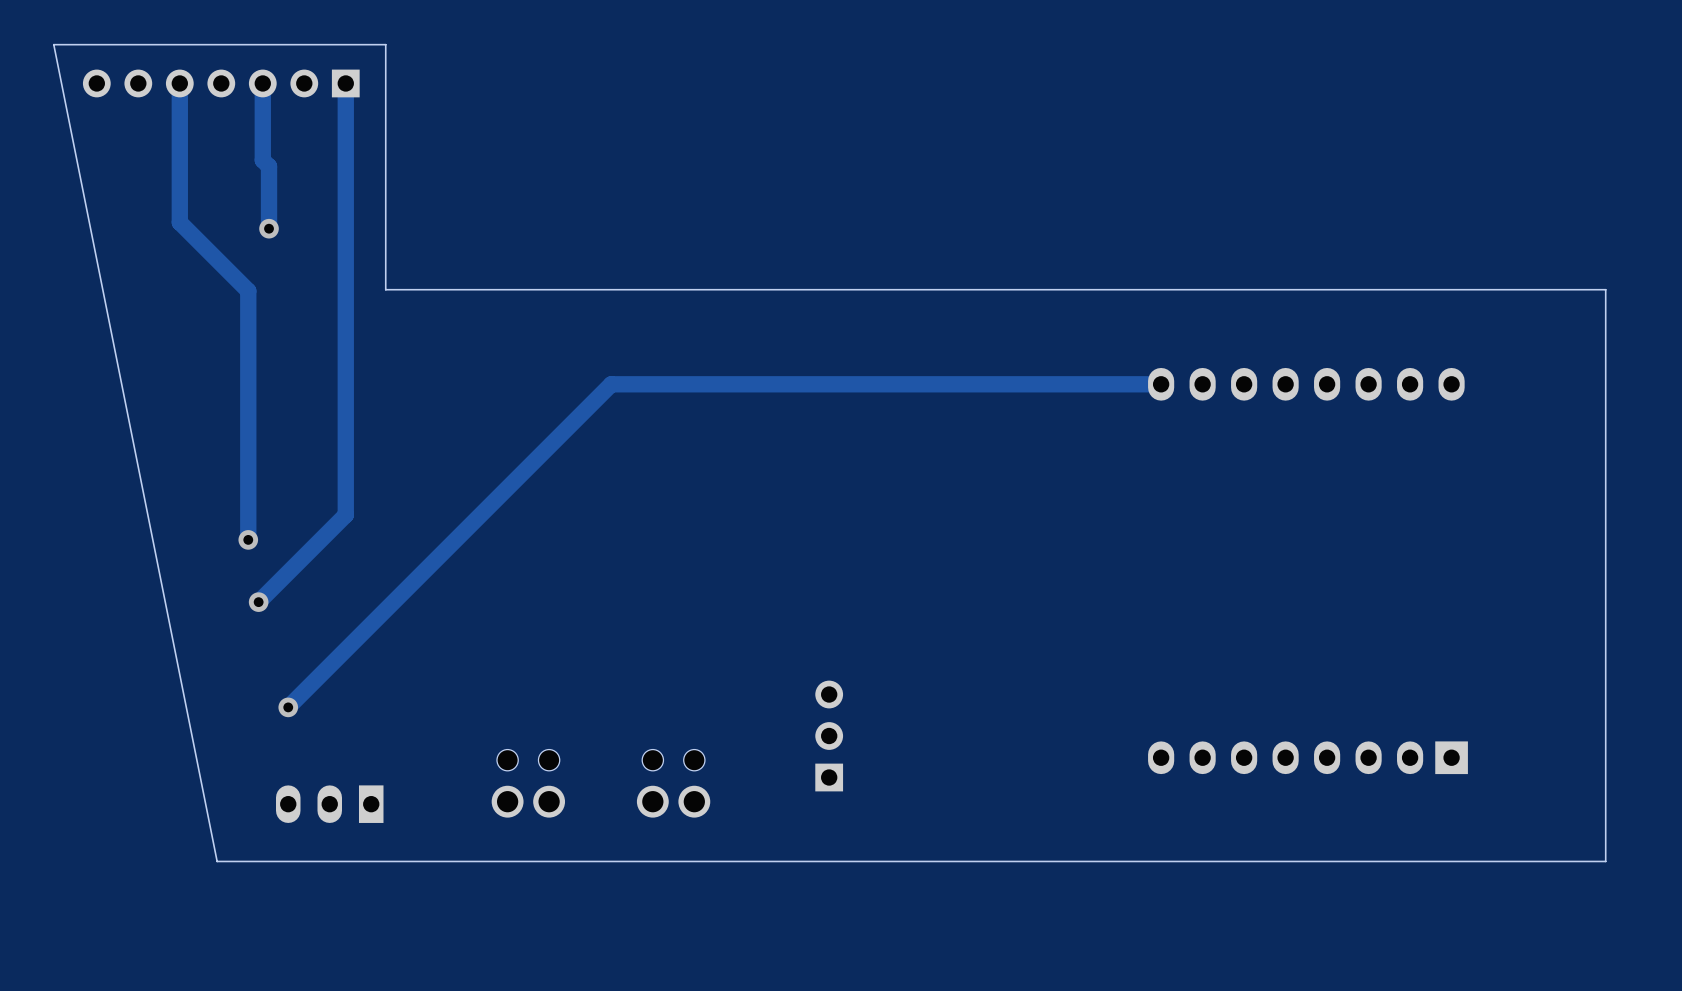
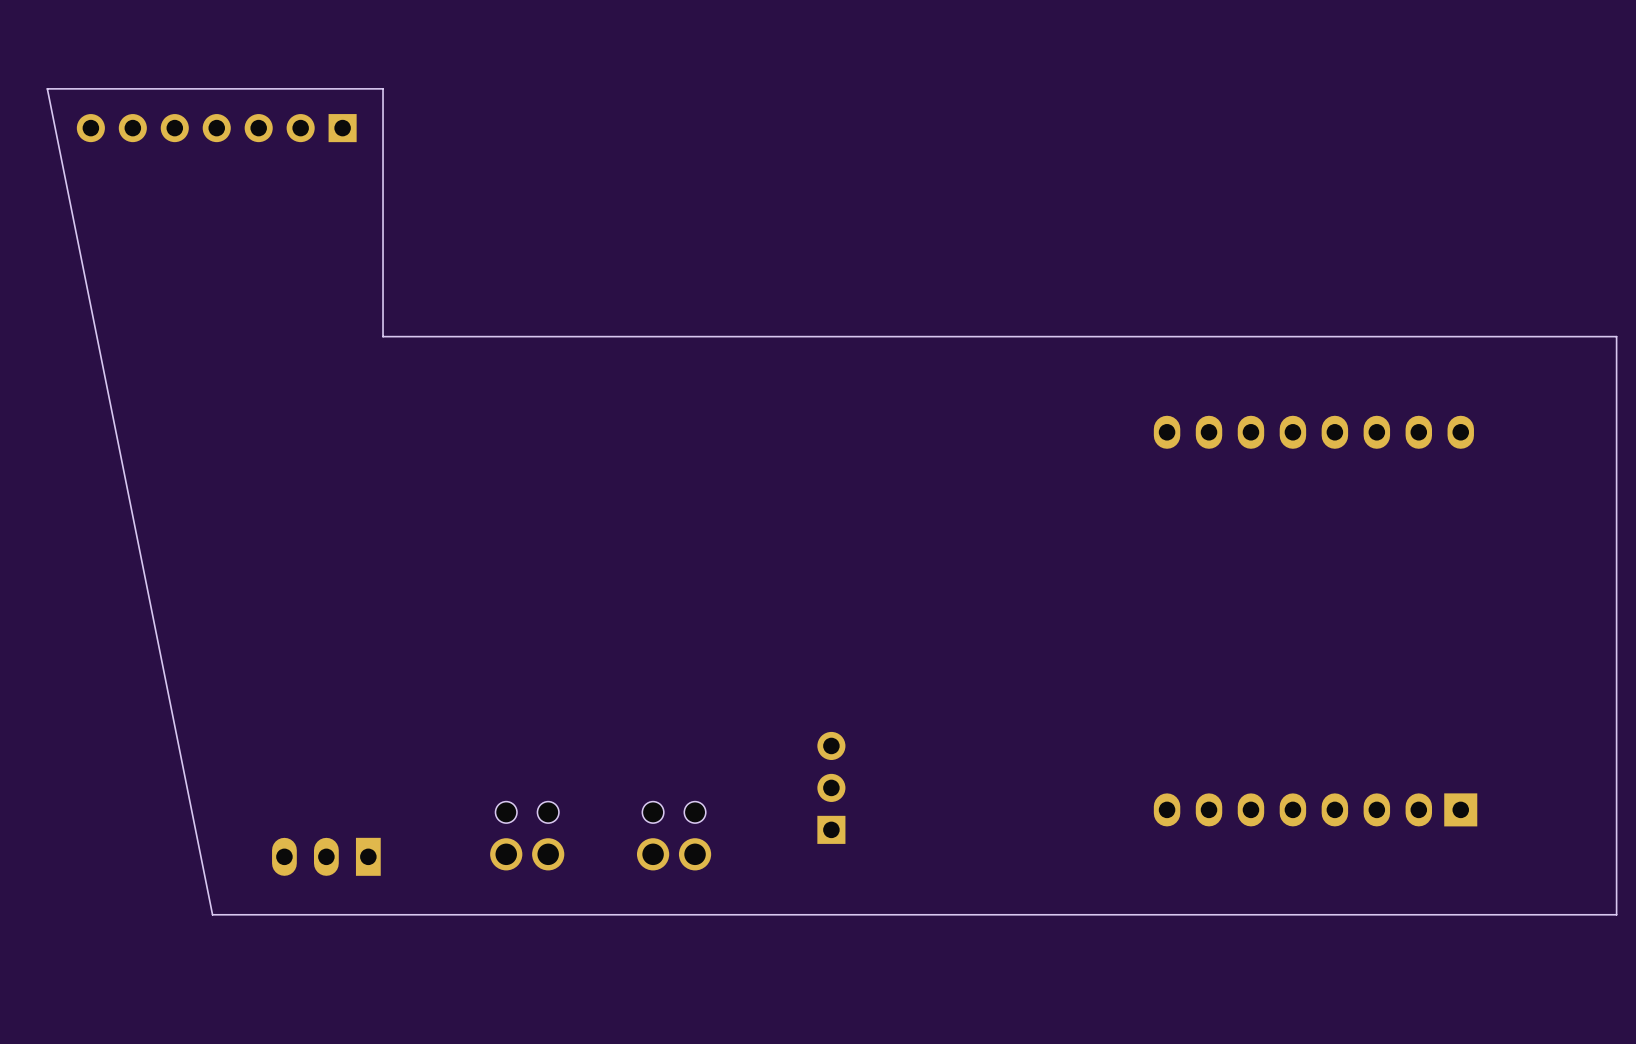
track: (179, 83) (179, 222) (248, 290) (248, 539) -> none
track: (262, 83) (262, 160) (269, 166) (269, 228) -> none
track: (345, 83) (345, 515) (258, 602) -> none
via: (269, 228) -> none
track: (1161, 384) (611, 384) (288, 707) -> none
via: (248, 539) -> none
via: (258, 602) -> none
via: (288, 707) -> none

